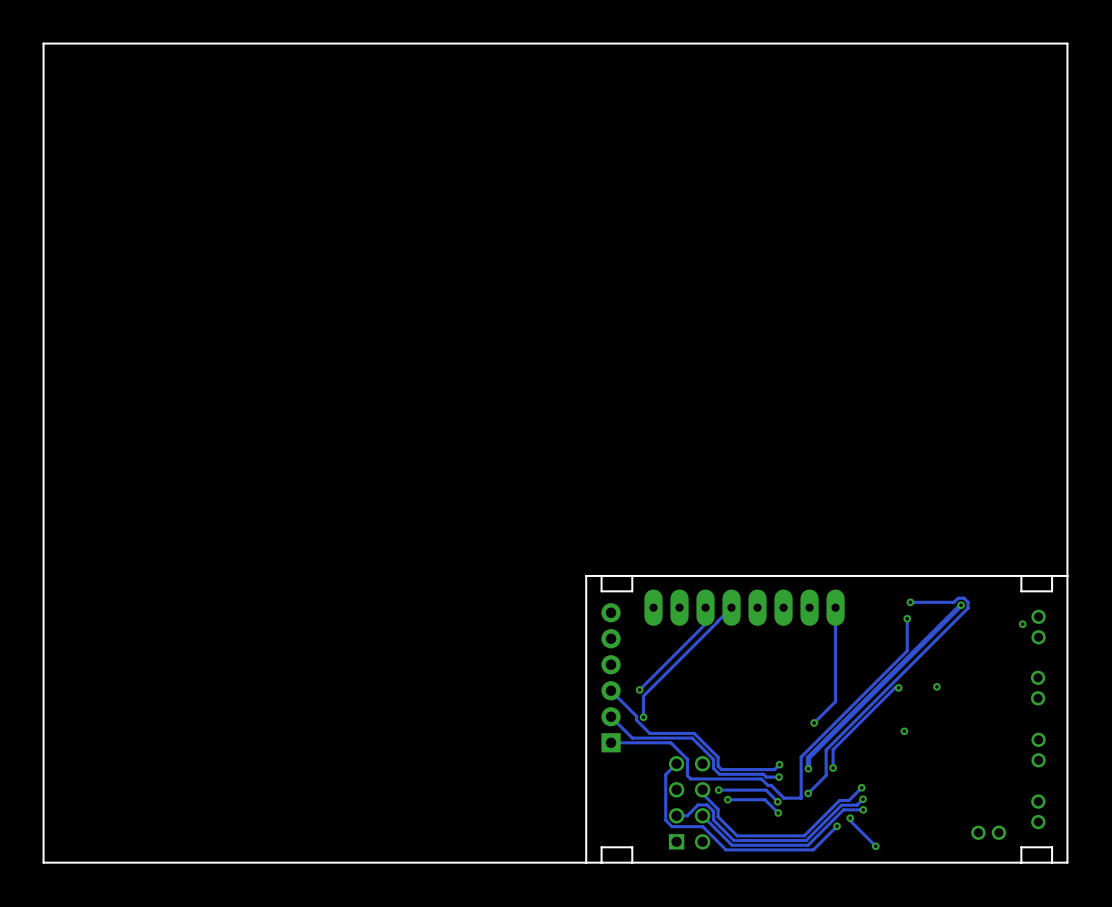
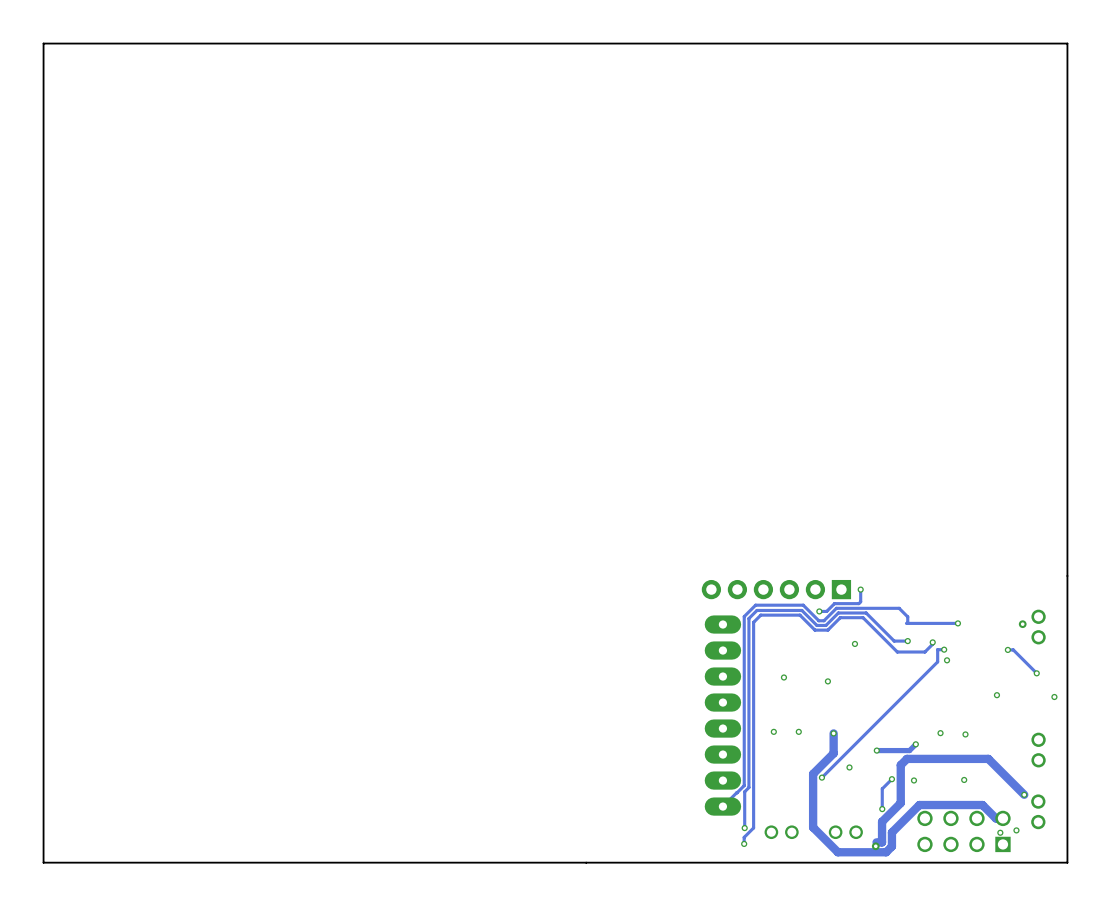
board edge: (632, 575) (632, 591) (601, 591) (601, 575) -> none
board edge: (1052, 575) (1052, 591) (1021, 591) (1021, 575) -> none
board edge: (1067, 575) (586, 575) (586, 862) -> none
track: none -> (860, 589) (860, 601) (858, 603) (834, 603) (826, 611) (819, 611)
via: none -> (860, 589)
track: (910, 602) (954, 602) (958, 598) (963, 598) (968, 602) (968, 608) (826, 750) (826, 775) (808, 793) -> none
via: (910, 602) -> none
track: (961, 605) (808, 757) (808, 768) -> none
via: (961, 605) -> none
track: (705, 607) (705, 624) (639, 689) -> none
track: (731, 607) (643, 696) (643, 717) -> none
part rotation: 0° (744, 607) -> 90° clockwise (722, 715)
track: (835, 607) (835, 701) (814, 723) -> none
via: none -> (819, 611)
track: (907, 618) (907, 650) (801, 757) (801, 798) (783, 798) (761, 778) (690, 778) (687, 775) (687, 759) (670, 742) (611, 742) -> none
via: (907, 618) -> none
track: none -> (908, 623) (907, 616) (899, 608) (836, 608) (823, 620) (818, 620) (803, 605) (755, 605) (744, 616) (744, 785) (722, 806)
track: none -> (957, 623) (906, 623)
via: none -> (957, 623)
track: none -> (907, 641) (894, 641) (866, 613) (838, 613) (825, 625) (816, 625) (801, 610) (756, 610) (748, 618) (748, 787) (744, 791) (744, 828)
via: none -> (907, 641)
track: none -> (932, 642) (924, 652) (897, 652) (863, 617) (840, 617) (827, 630) (814, 630) (799, 615) (760, 615) (753, 622) (753, 827) (744, 837) (744, 843)
via: none -> (932, 642)
via: none -> (854, 643)
track: none -> (944, 649) (937, 649) (937, 661) (821, 777)
via: none -> (944, 649)
track: none -> (1007, 649) (1013, 649) (1036, 673)
via: none -> (1007, 649)
via: none -> (947, 660)
via: none -> (1036, 673)
part rotation: 0° (611, 677) -> 90° counterclockwise (776, 589)
part position: (611, 677) -> (776, 589)
via: none -> (783, 677)
via: none -> (827, 681)
via: (936, 686) -> none
track: (898, 687) (894, 687) (833, 749) (833, 768) -> none
via: (898, 687) -> none
part: (1038, 688) -> none
via: (639, 689) -> none
track: (611, 690) (636, 716) (636, 720) (649, 733) (694, 733) (718, 757) (718, 766) (721, 769) (774, 769) (779, 764) -> none
via: none -> (996, 695)
via: none -> (1054, 697)
track: (611, 716) (632, 738) (692, 738) (713, 759) (713, 768) (719, 774) (763, 774) (766, 777) (779, 777) -> none
via: (643, 717) -> none
via: (814, 723) -> none
via: none -> (773, 731)
via: none -> (798, 731)
via: (904, 731) -> none
track: none -> (833, 733) (833, 753) (813, 773) (813, 827) (837, 852) (886, 852) (891, 846) (891, 832) (919, 805) (982, 805) (995, 818) (1002, 818)
via: none -> (833, 733)
via: none -> (940, 733)
via: none -> (965, 734)
track: none -> (915, 744) (909, 750) (876, 750)
via: none -> (915, 744)
via: none -> (876, 750)
track: (676, 763) (665, 774) (665, 820) (672, 826) (702, 826) (726, 849) (813, 849) (837, 826) -> none
via: (779, 764) -> none
via: none -> (849, 767)
via: (808, 768) -> none
via: (833, 768) -> none
via: (779, 777) -> none
via: none -> (821, 777)
track: none -> (891, 779) (882, 788) (882, 809)
via: none -> (891, 779)
via: none -> (964, 779)
via: none -> (914, 780)
track: (861, 787) (848, 800) (839, 800) (804, 835) (737, 835) (718, 816) (718, 809) (702, 793) (702, 789) -> none
via: (861, 787) -> none
track: (718, 790) (766, 790) (777, 801) -> none
via: (718, 790) -> none
via: (808, 793) -> none
track: none -> (1024, 794) (988, 758) (906, 758) (900, 765) (900, 803) (882, 821) (882, 842) (876, 842)
via: none -> (1024, 794)
track: (727, 799) (764, 799) (778, 812) -> none
via: (727, 799) -> none
track: (863, 799) (857, 805) (841, 805) (806, 840) (733, 840) (713, 820) (713, 811) (707, 804) (698, 804) (687, 815) (676, 815) -> none
via: (863, 799) -> none
via: (777, 801) -> none
part: (689, 802) -> none
track: (863, 809) (843, 809) (808, 845) (732, 845) (702, 815) -> none
via: (863, 809) -> none
via: none -> (882, 809)
via: (778, 812) -> none
track: (850, 818) (850, 820) (875, 846) -> none
via: (850, 818) -> none
via: (837, 826) -> none
via: none -> (744, 828)
via: none -> (1016, 830)
part: none -> (963, 831)
part: none -> (781, 832)
part: none -> (845, 832)
part: (988, 832) -> none
via: none -> (1000, 832)
via: none -> (744, 843)
board edge: (632, 862) (632, 847) (601, 847) (601, 862) -> none
board edge: (1052, 862) (1052, 847) (1021, 847) (1021, 862) -> none

